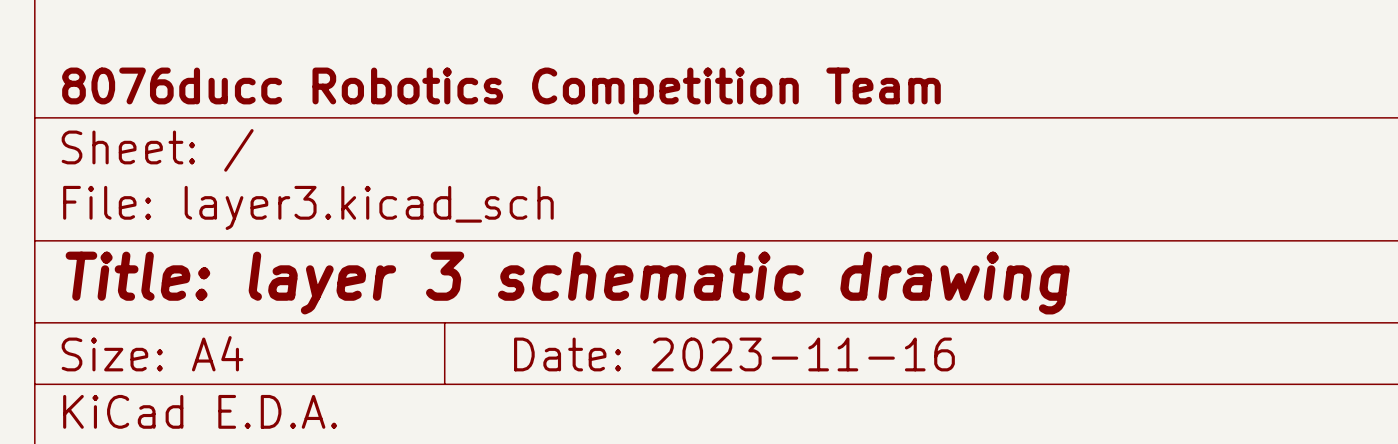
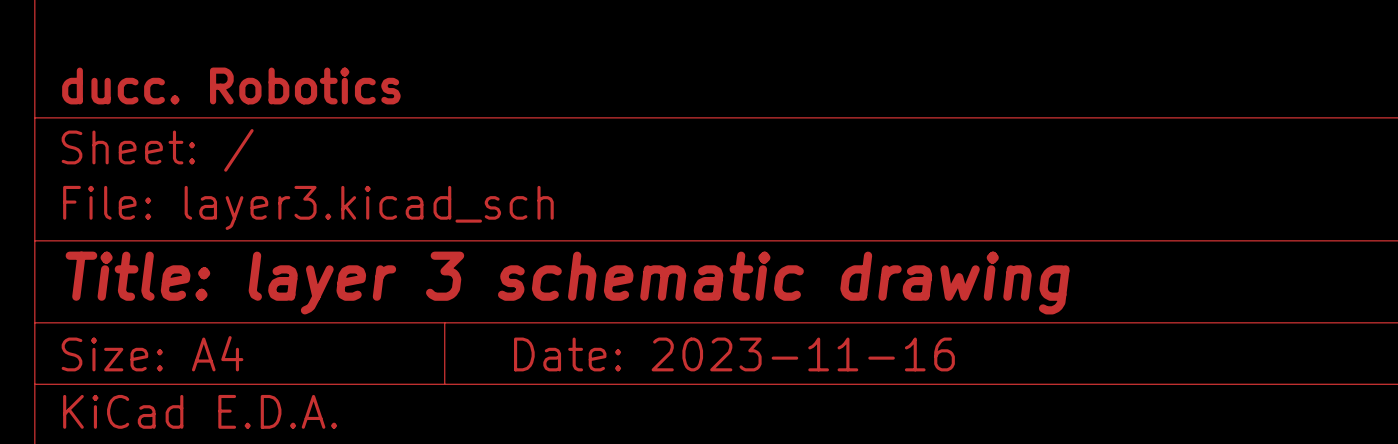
title block: 8076ducc Robotics Competition Team (501, 91) -> ducc. Robotics (231, 85)

